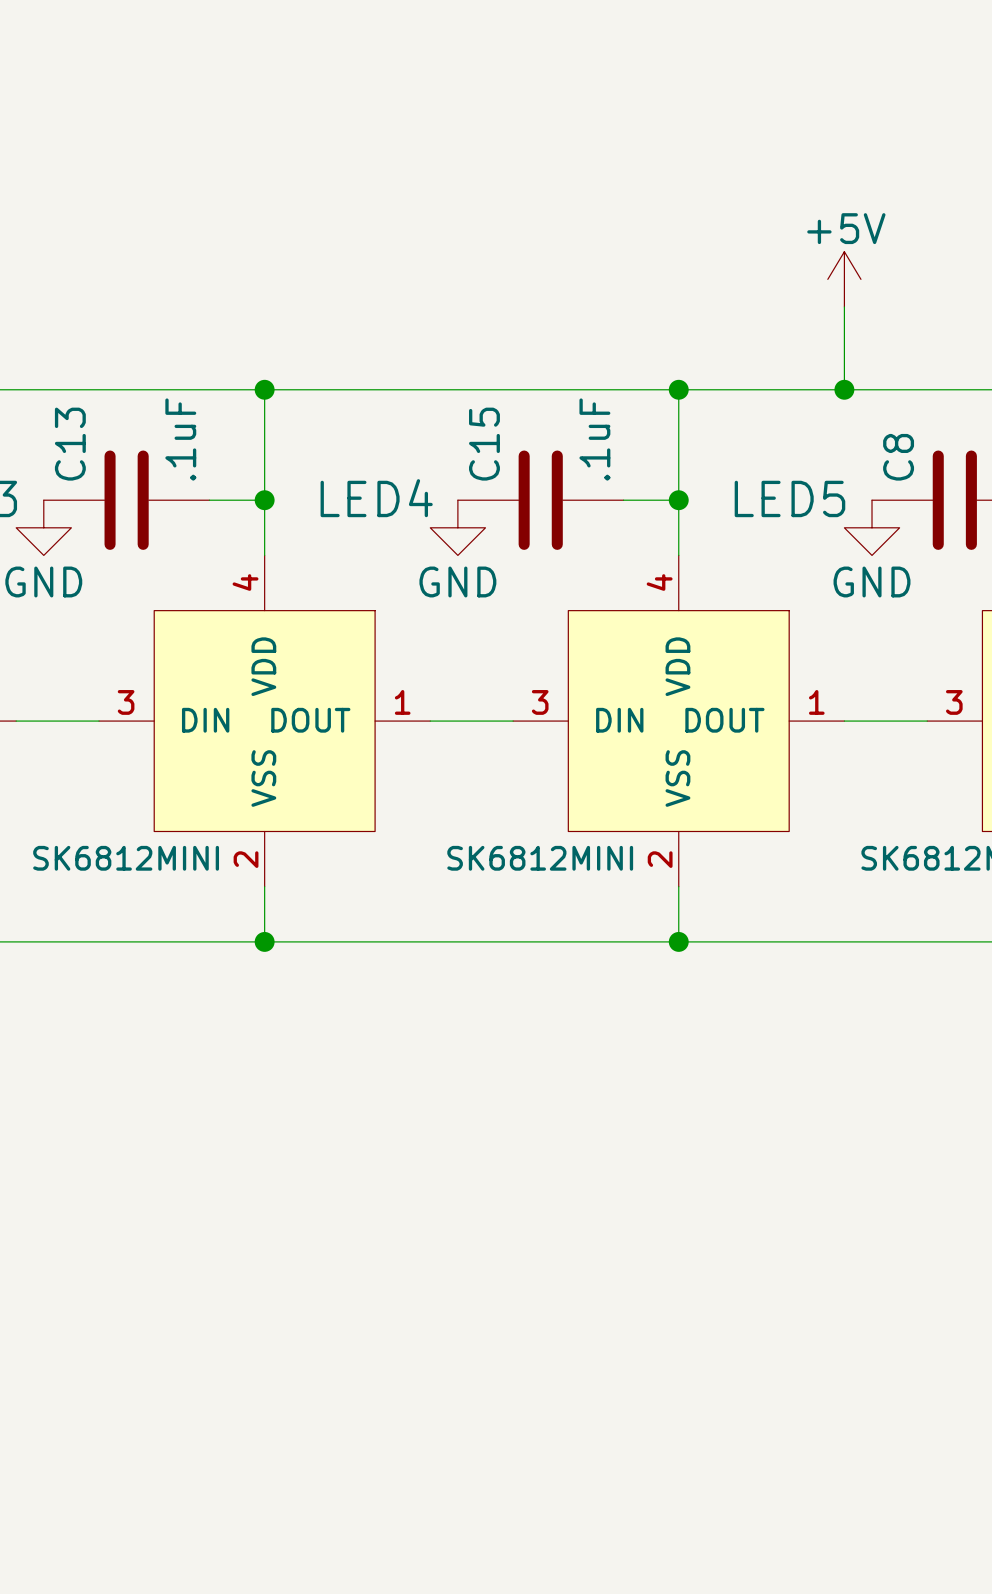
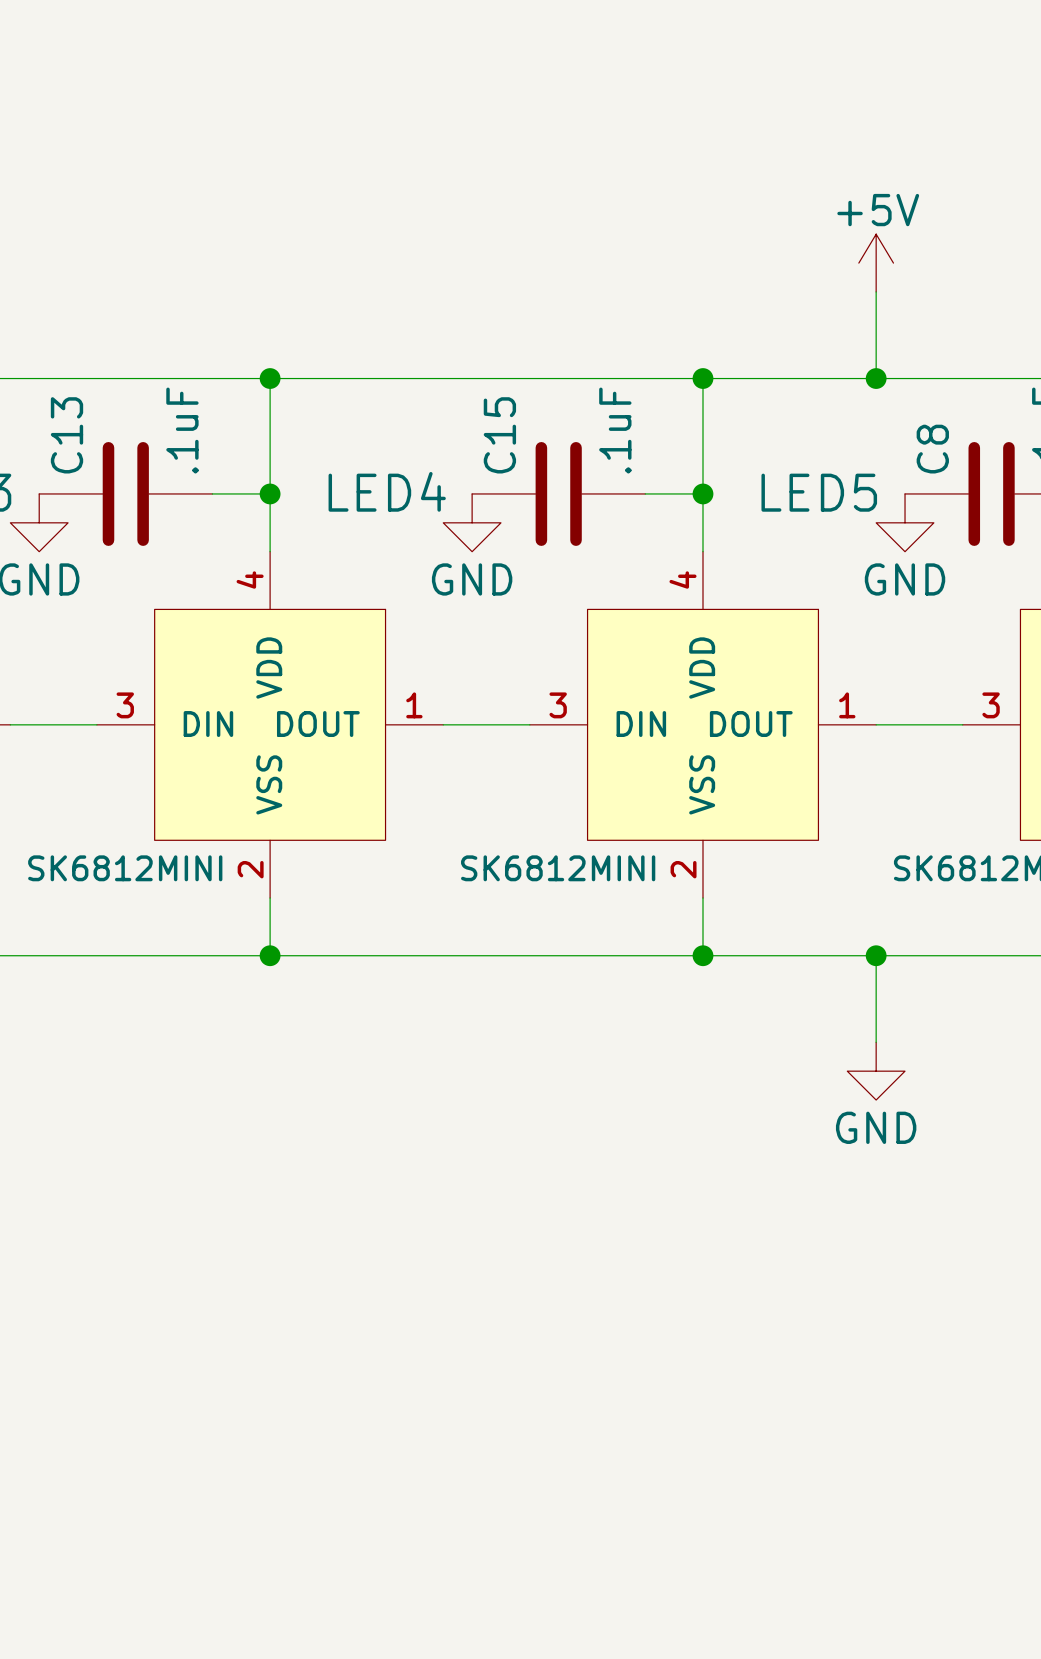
wire: none -> (876, 955) (876, 1042)
junction: none -> (876, 955)
power symbol: none -> GND (876, 1071)

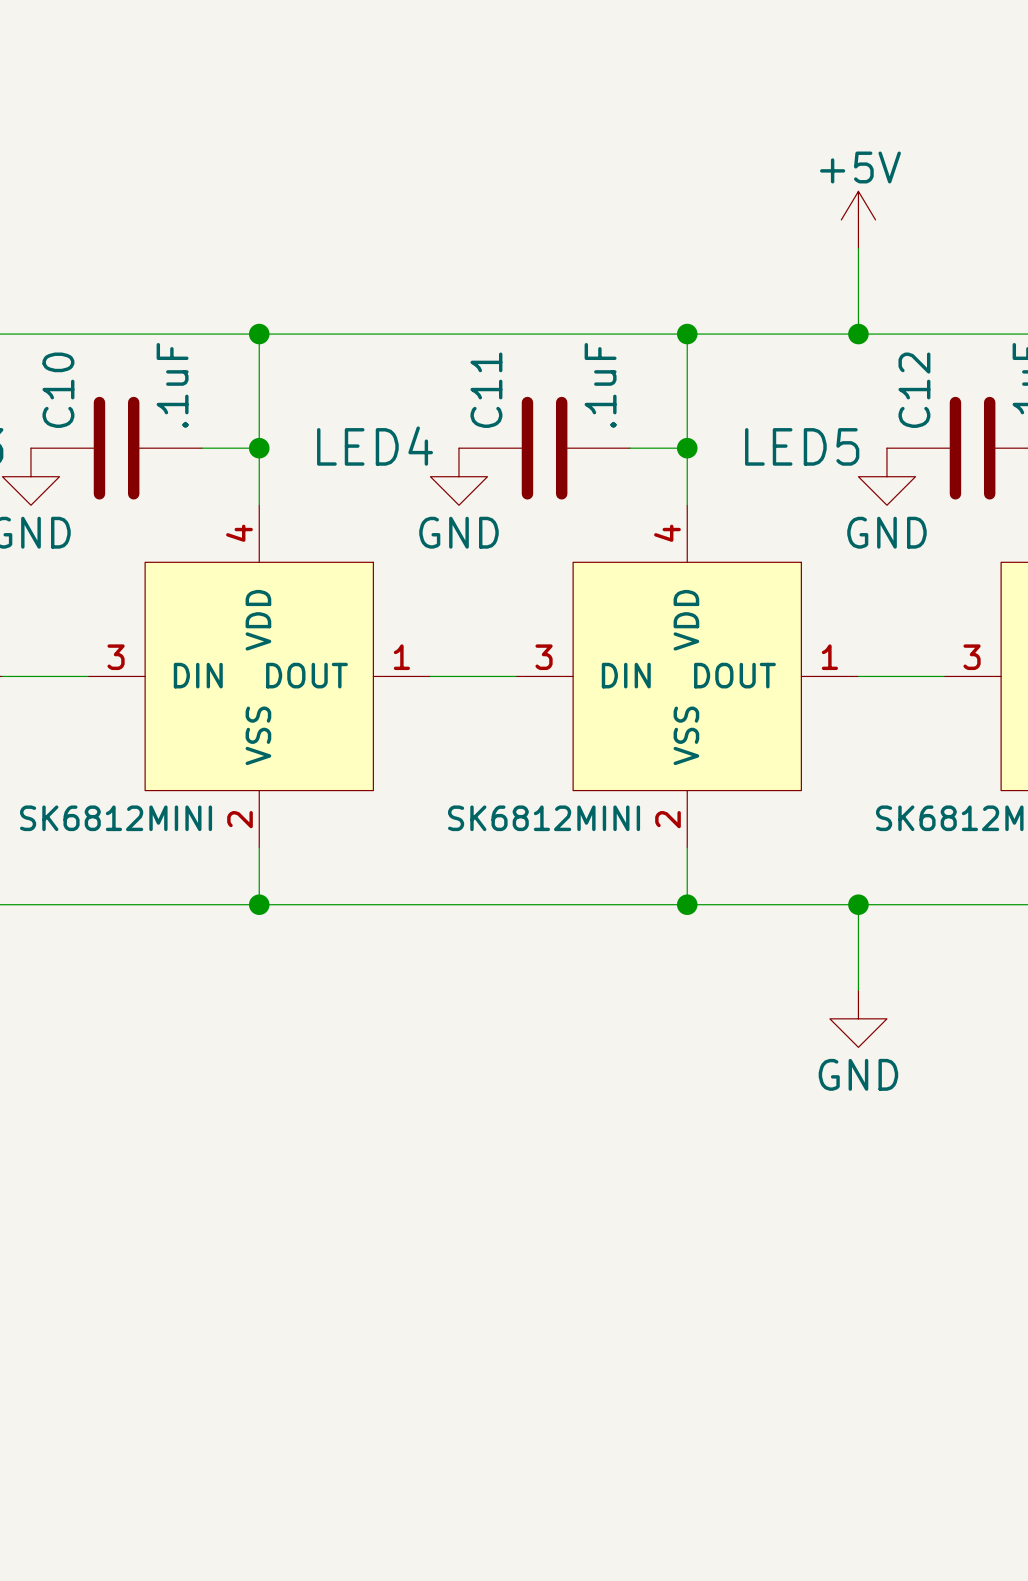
C13 name: C13 (67, 435) -> C10 (58, 390)
C15 name: C15 (499, 435) -> C11 (486, 390)
C8 name: C8 (932, 449) -> C12 (914, 390)

